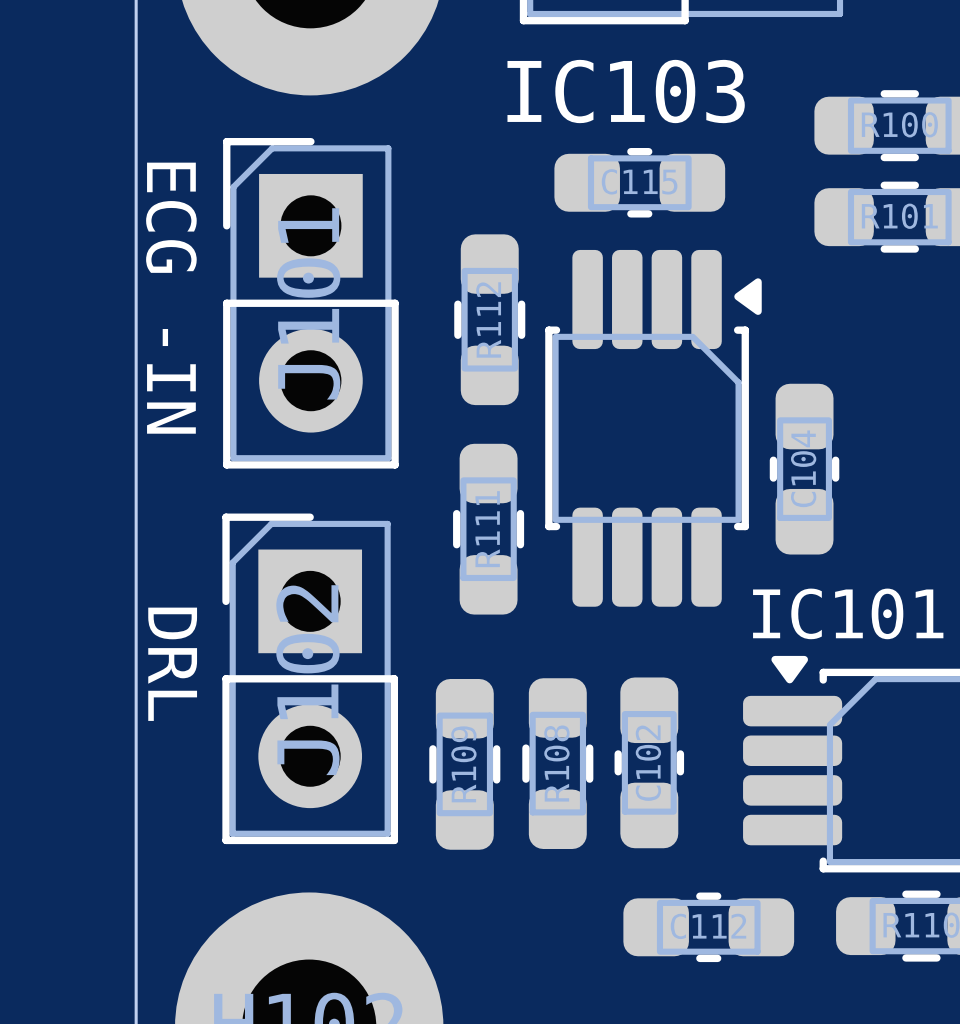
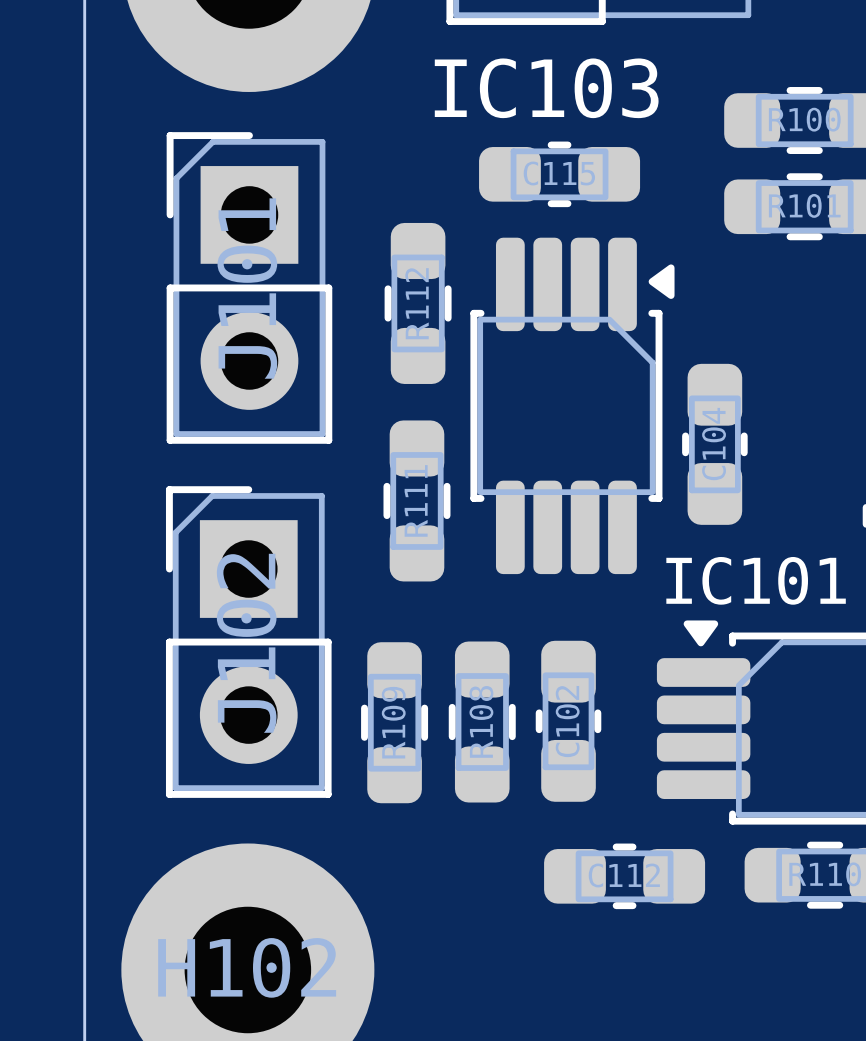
text: ECG -IN (171, 298) -> none
text: DRL (172, 664) -> none

